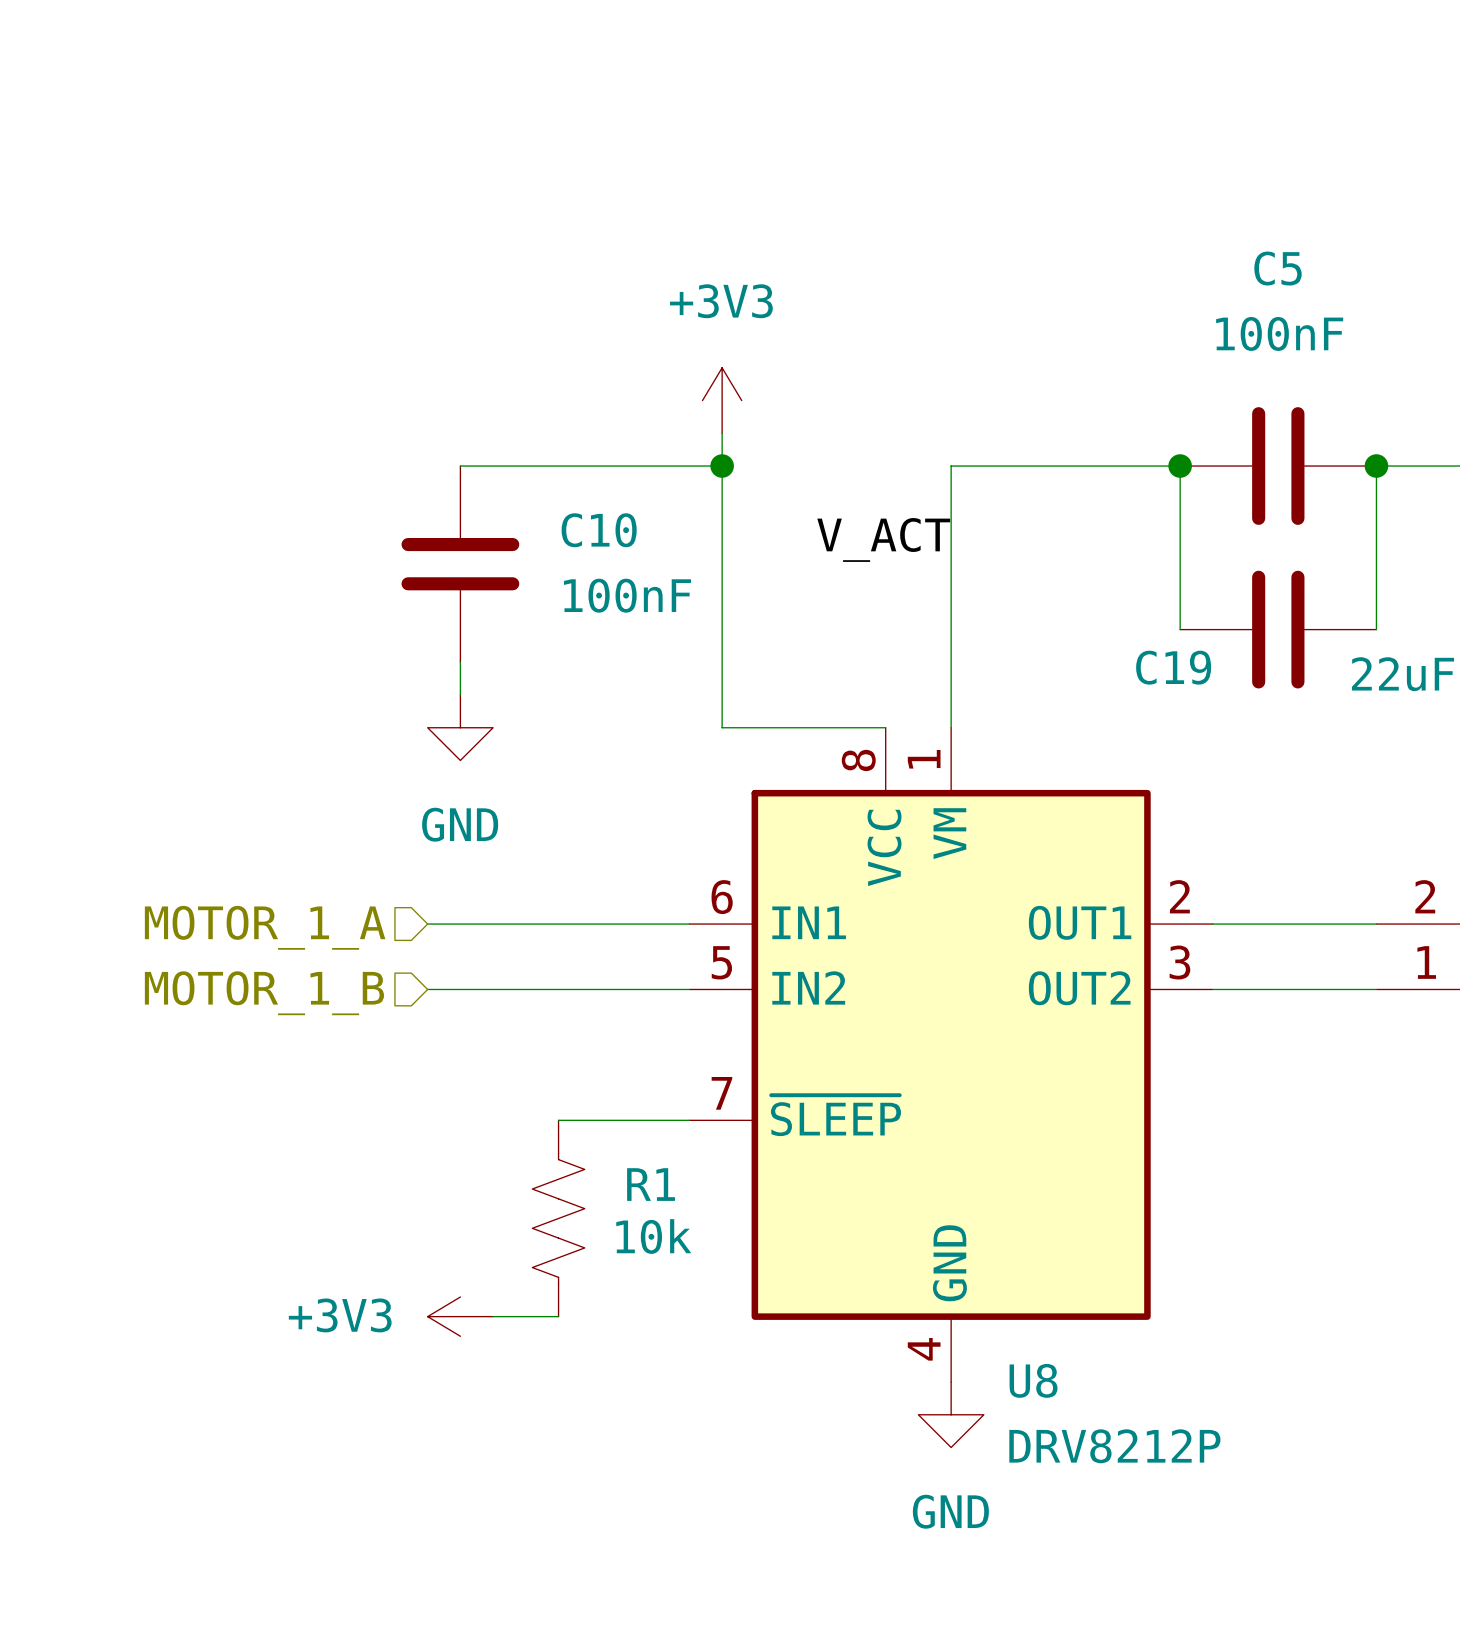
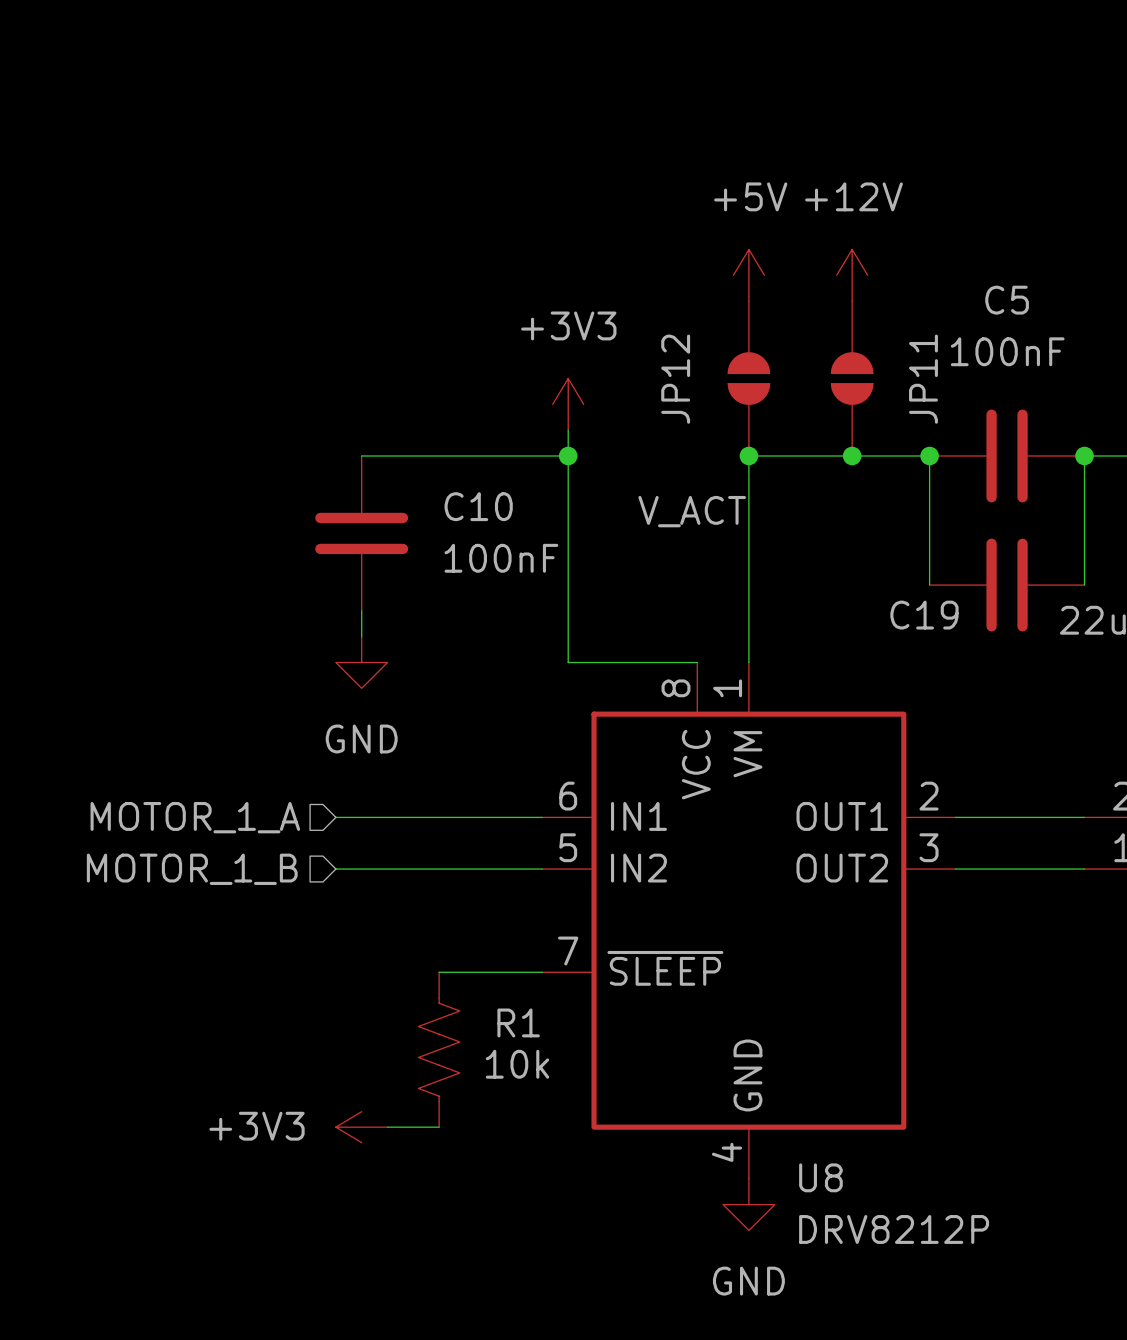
power symbol: none -> +5V (748, 275)
power symbol: none -> +12V (852, 275)
JP12: none -> (748, 378)
JP11: none -> (852, 378)
junction: none -> (748, 455)
junction: none -> (852, 455)

